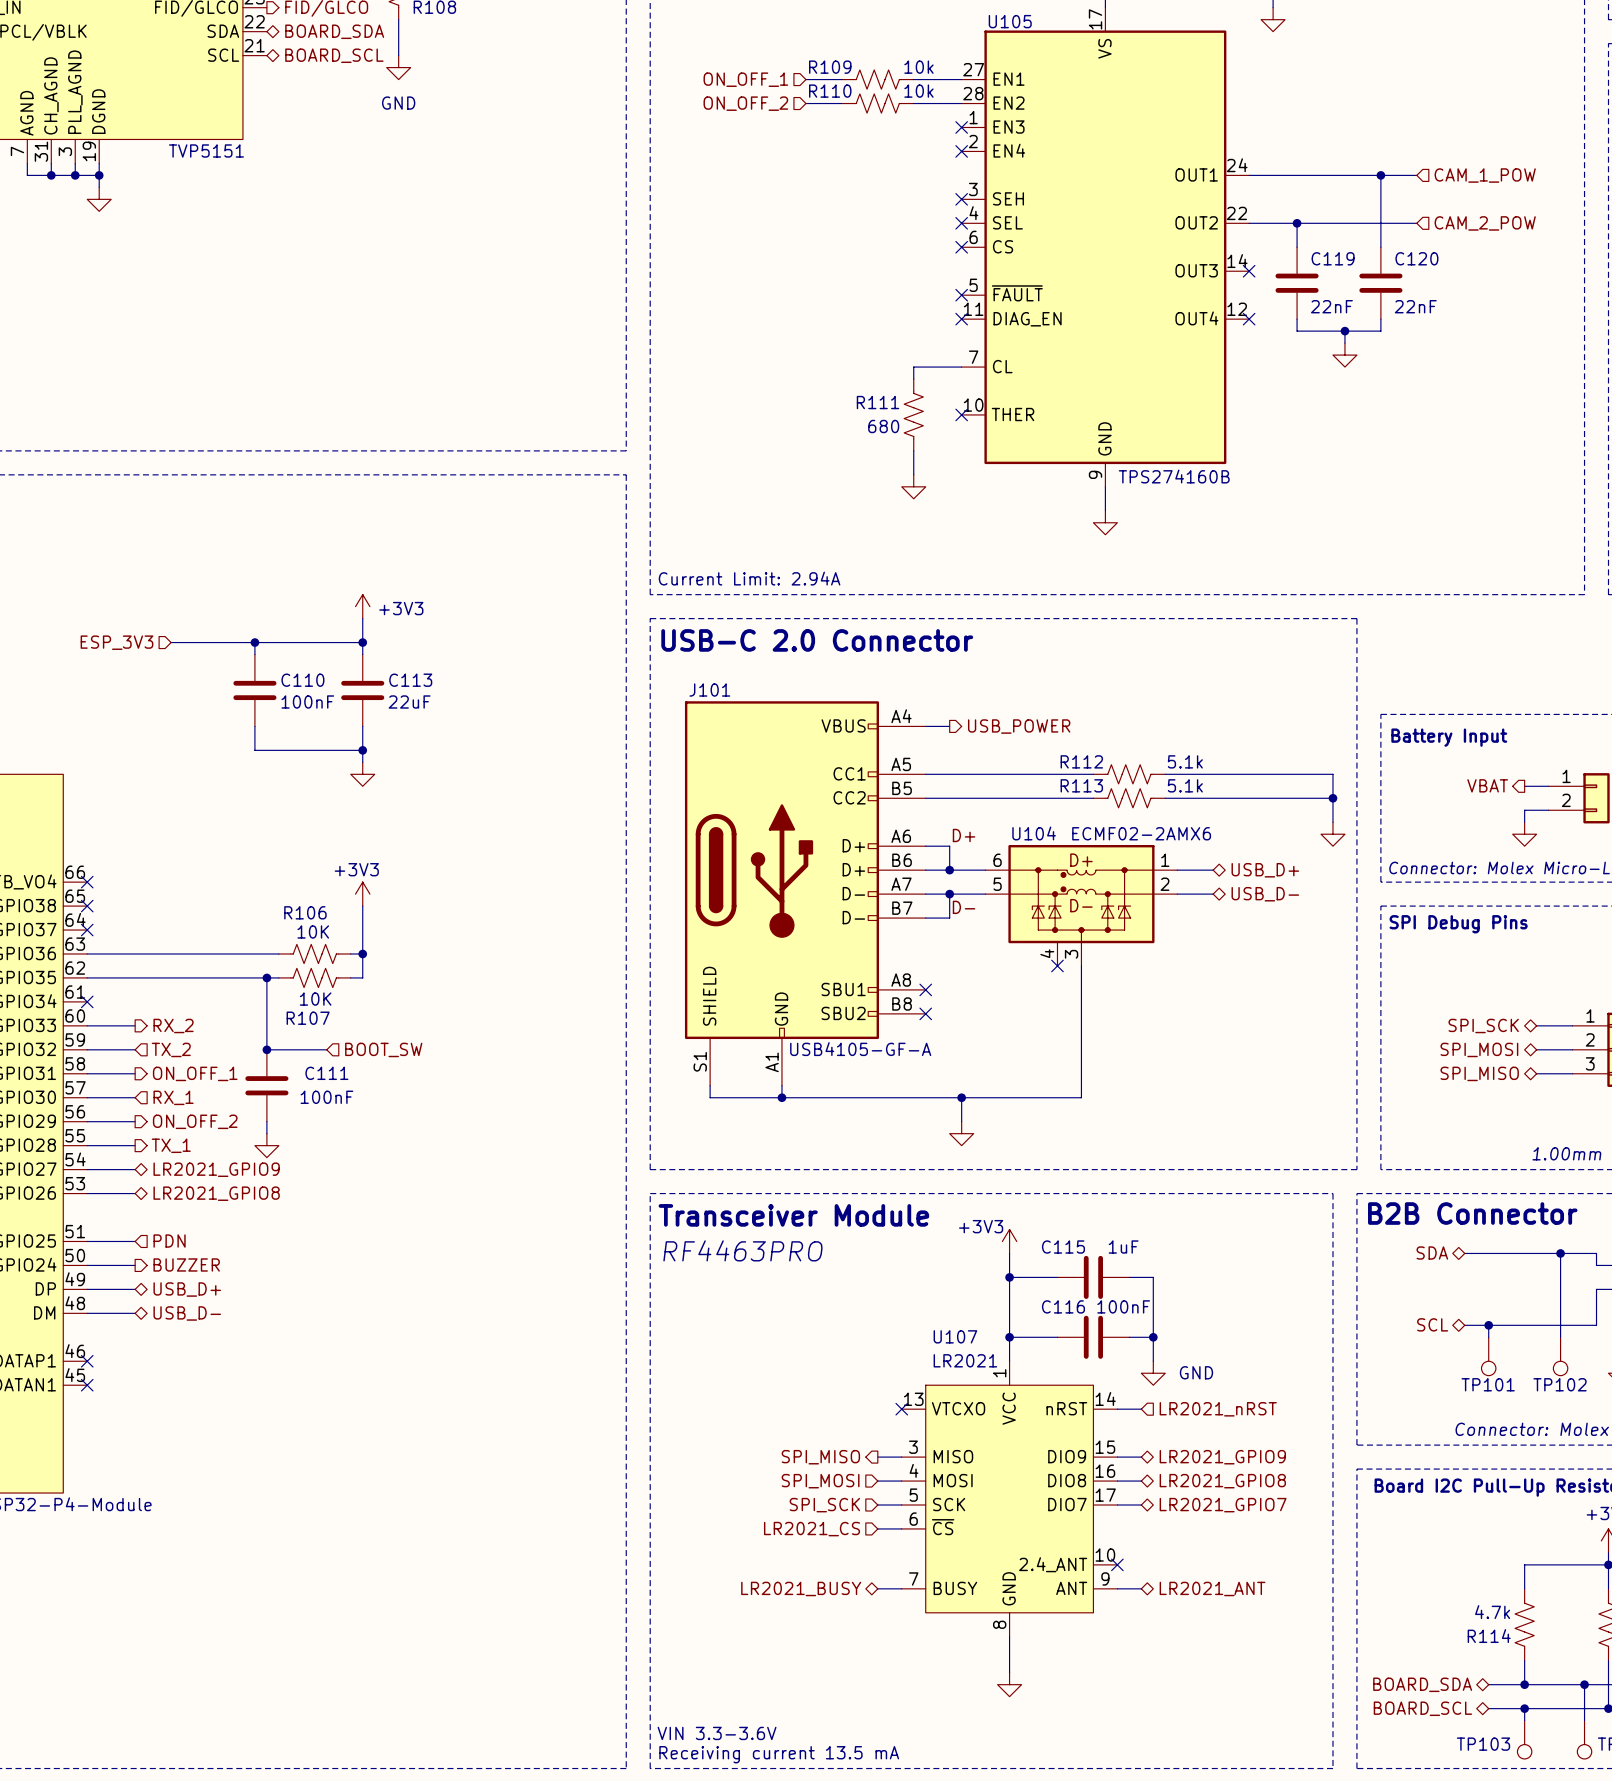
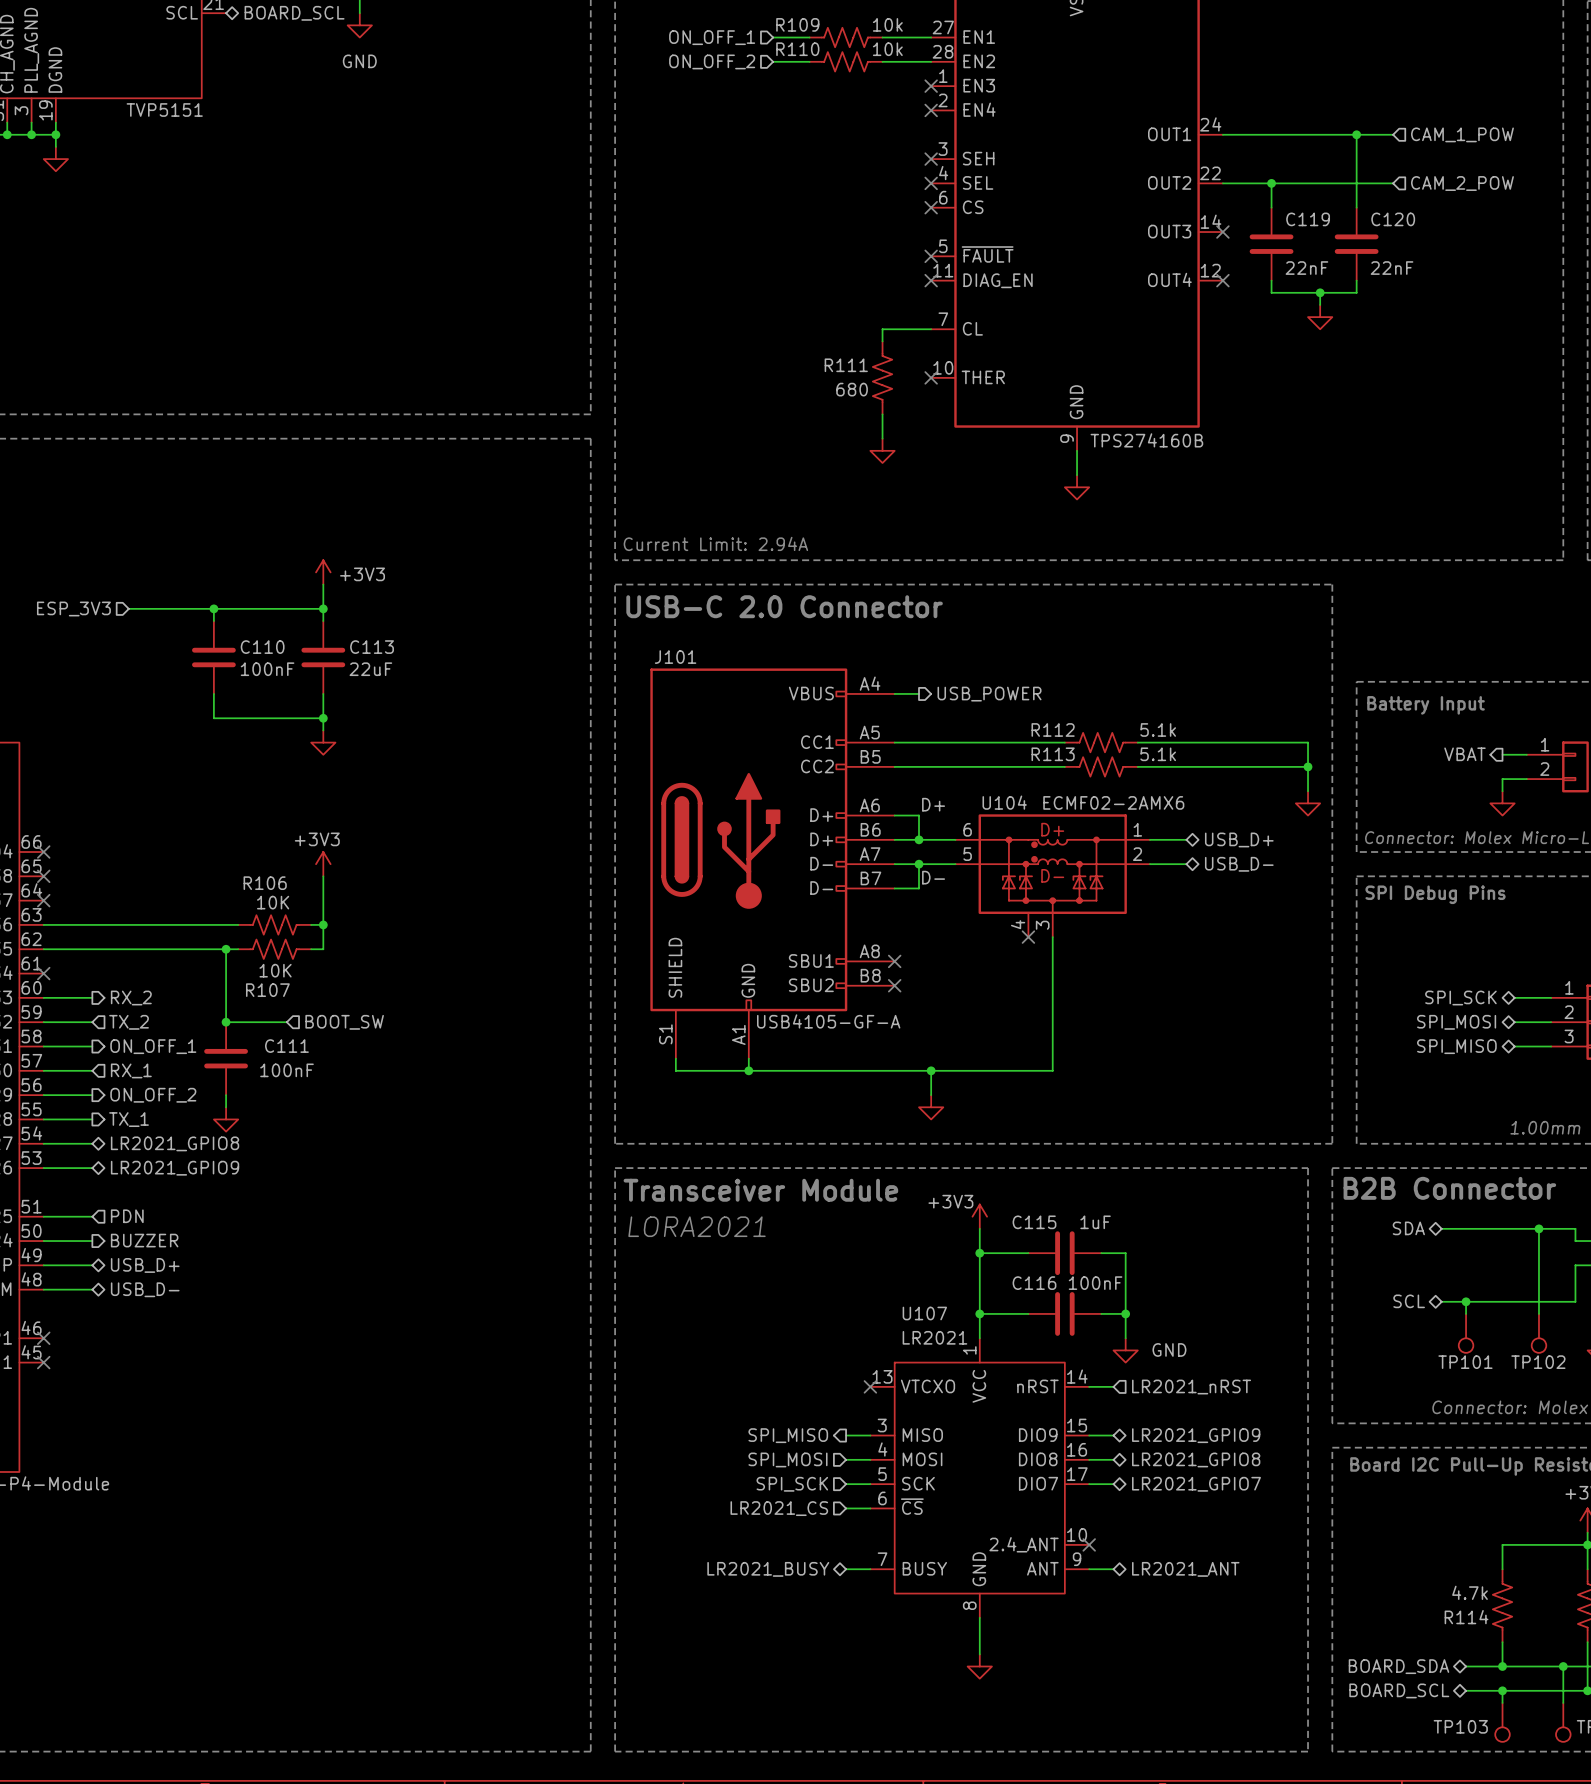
hierarchical label: LR2021_GPIO9 (216, 1169) -> LR2021_GPIO8 (175, 1143)
hierarchical label: LR2021_GPIO8 (216, 1193) -> LR2021_GPIO9 (175, 1168)
text: RF4463PRO (742, 1250) -> LORA2021 (697, 1226)
text: VIN 3.3-3.6V (717, 1733) -> none
text: Receiving current 13.5 mA (779, 1754) -> none

